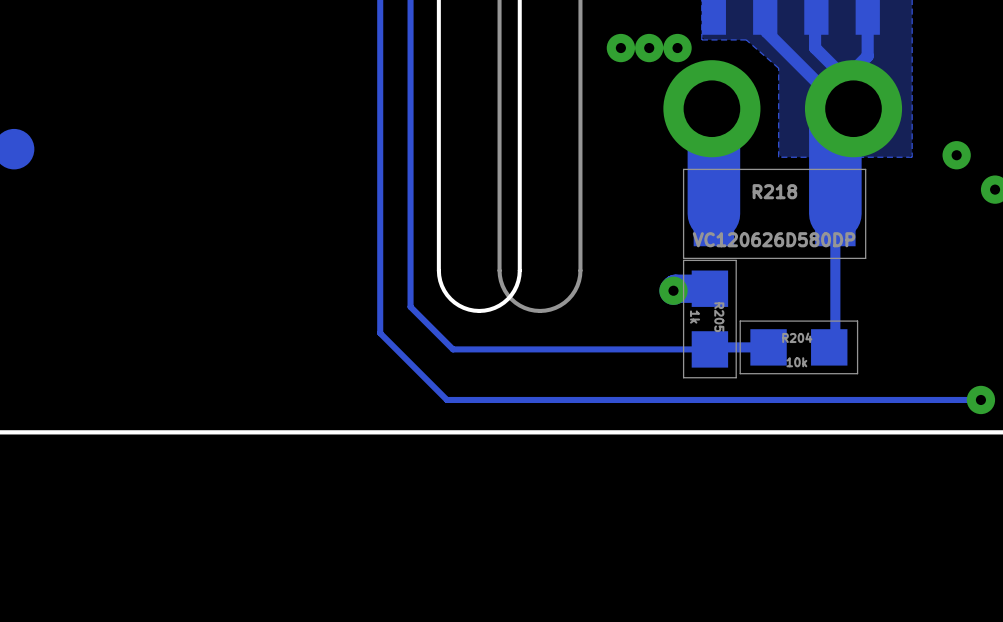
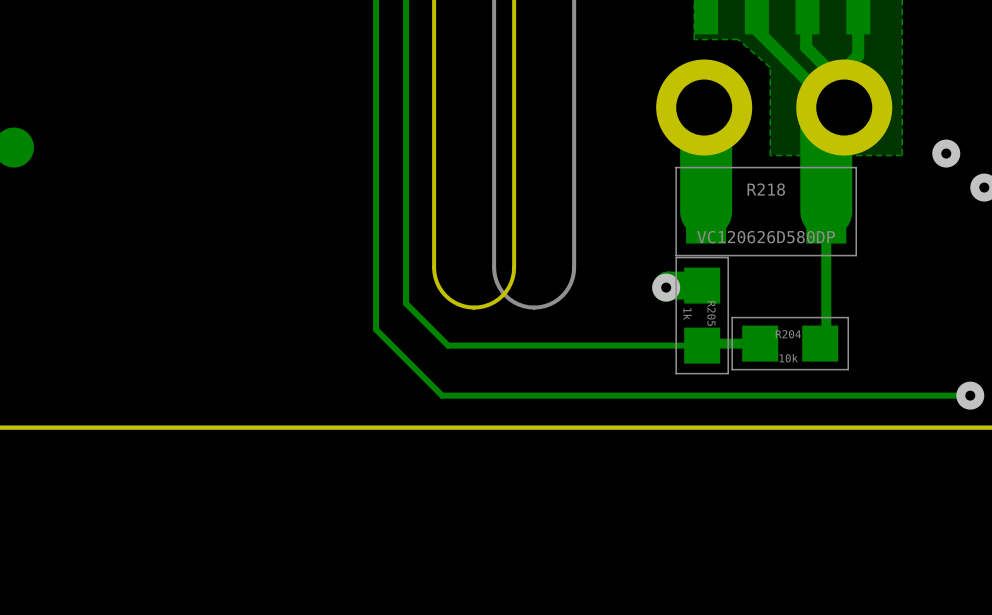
via: (620, 48) -> none
via: (649, 48) -> none
via: (677, 48) -> none

